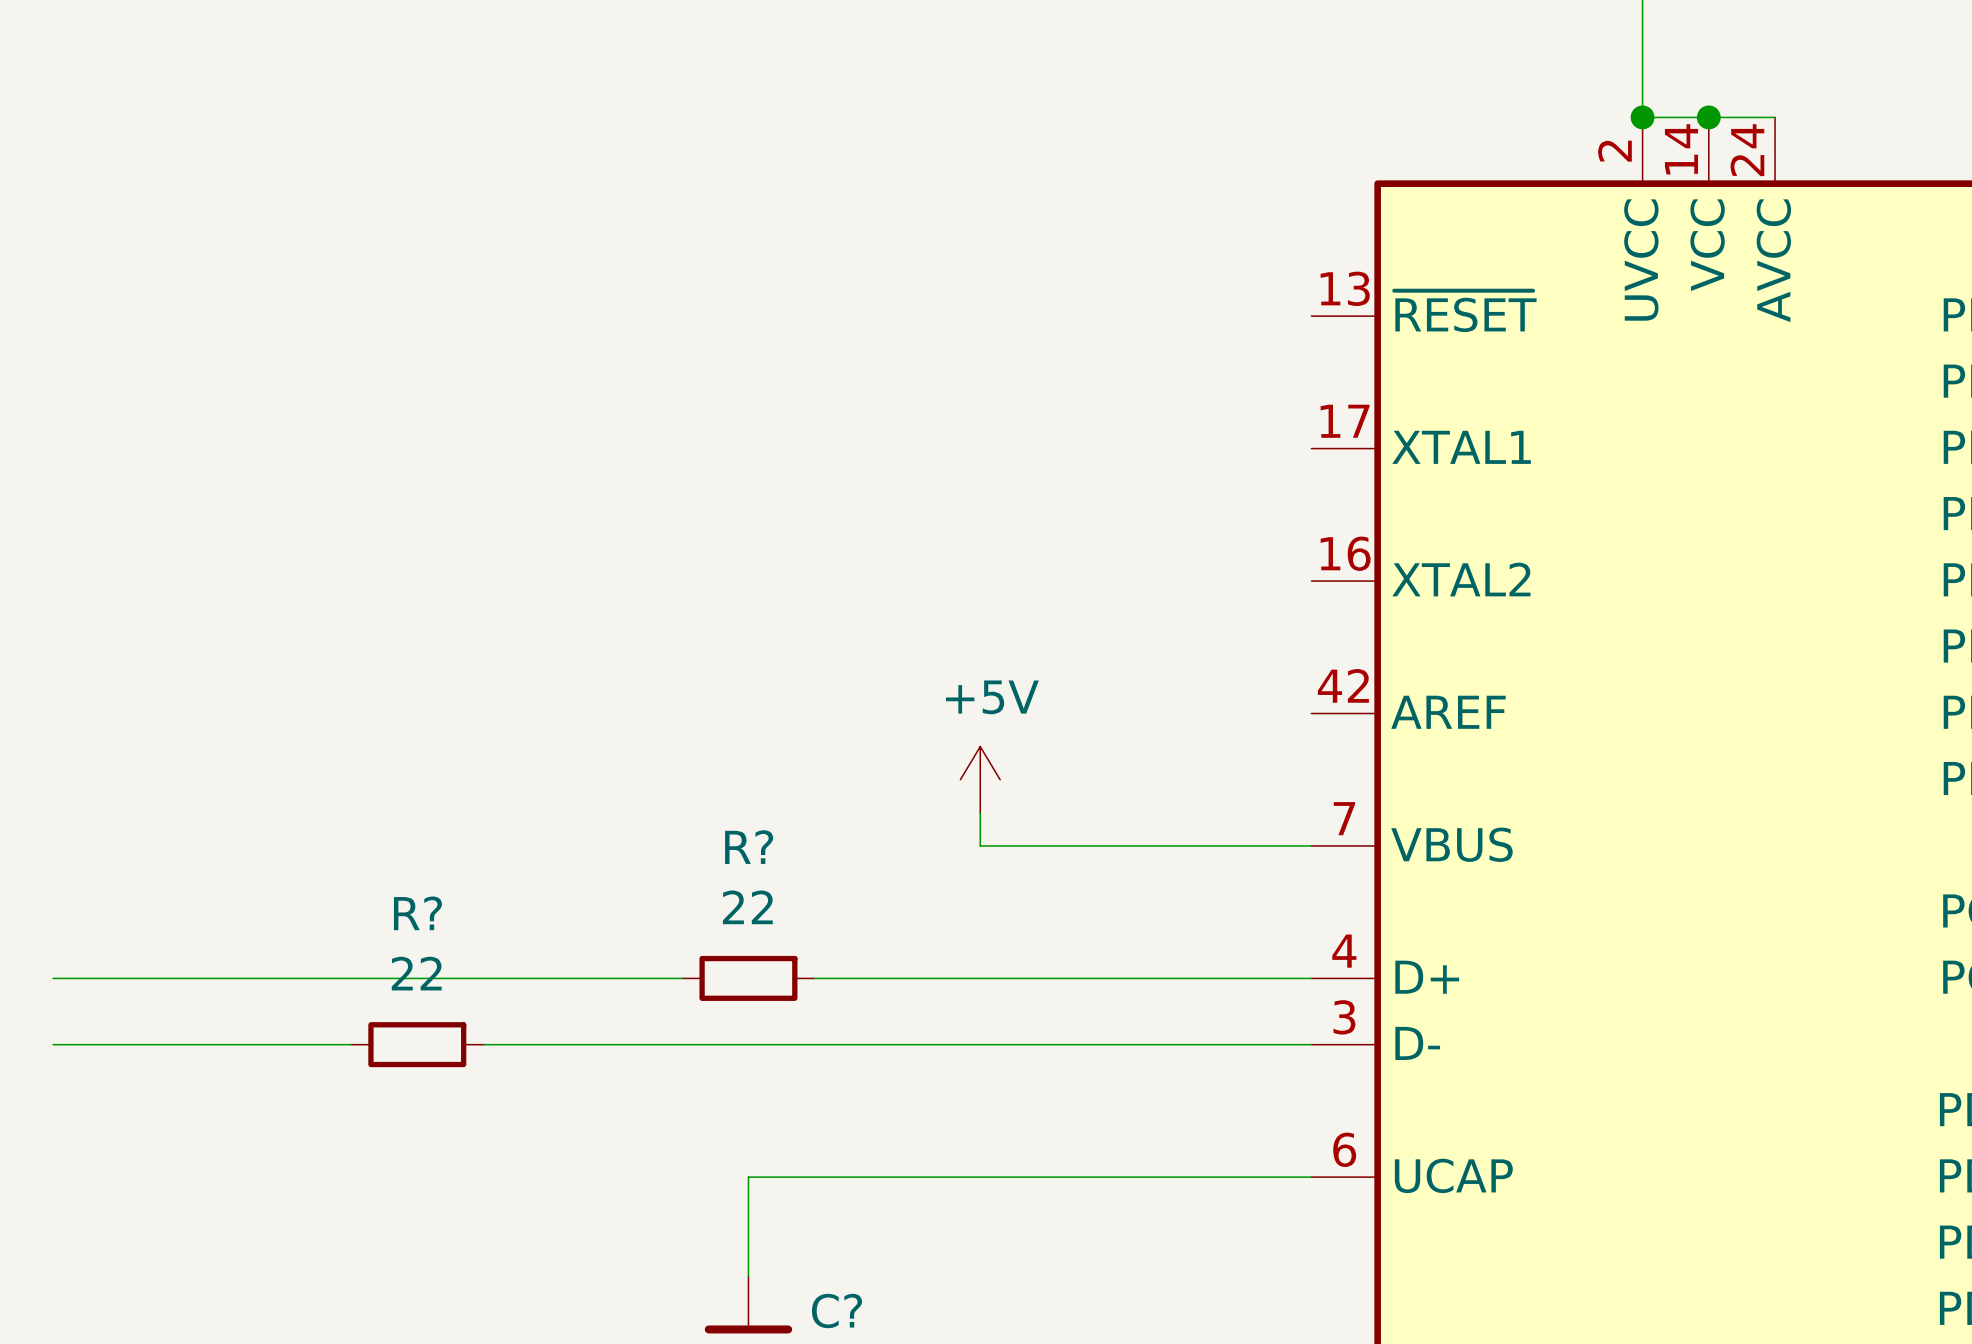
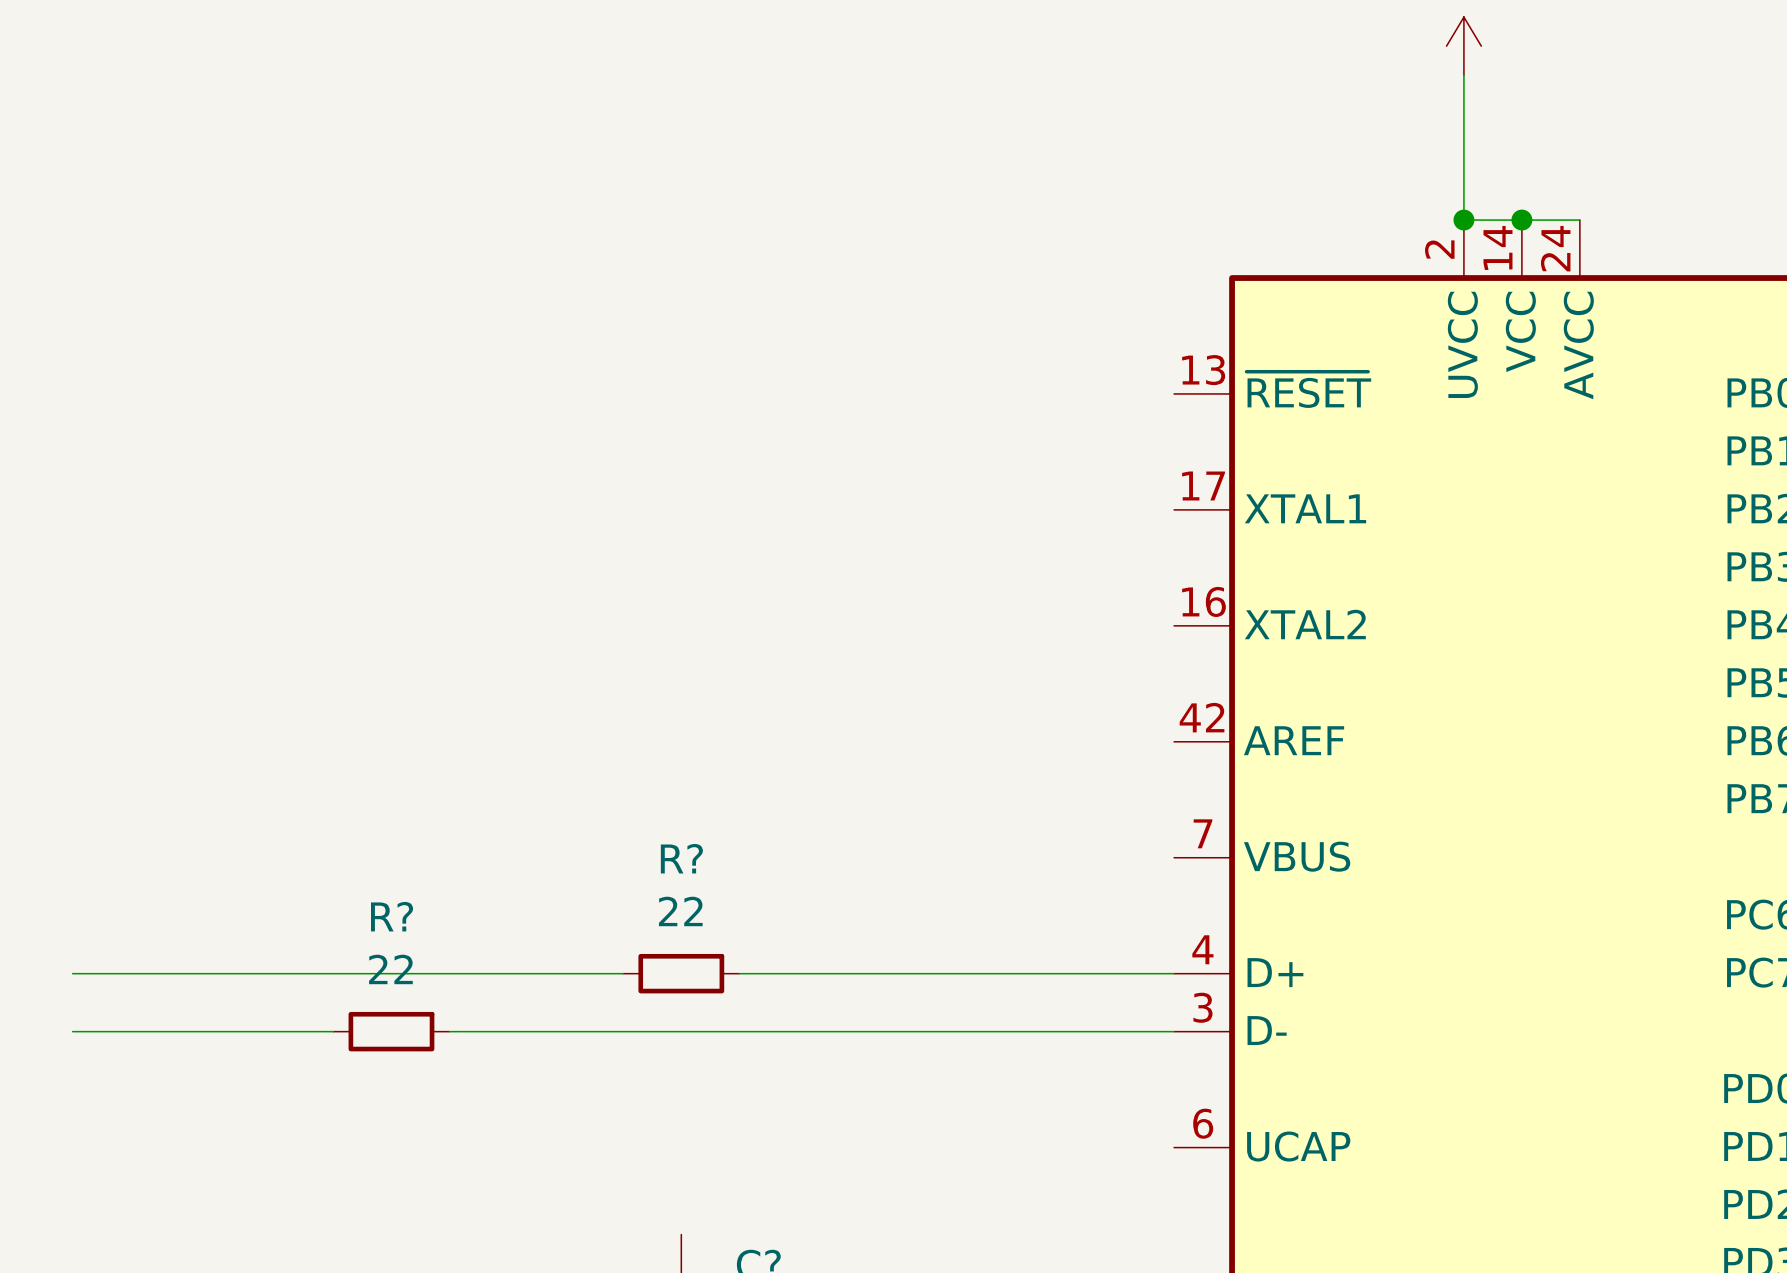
power symbol: +5V (980, 779) -> none
wire: (980, 812) (980, 845) (1311, 845) -> none
wire: (1311, 1177) (748, 1177) (748, 1276) -> none

